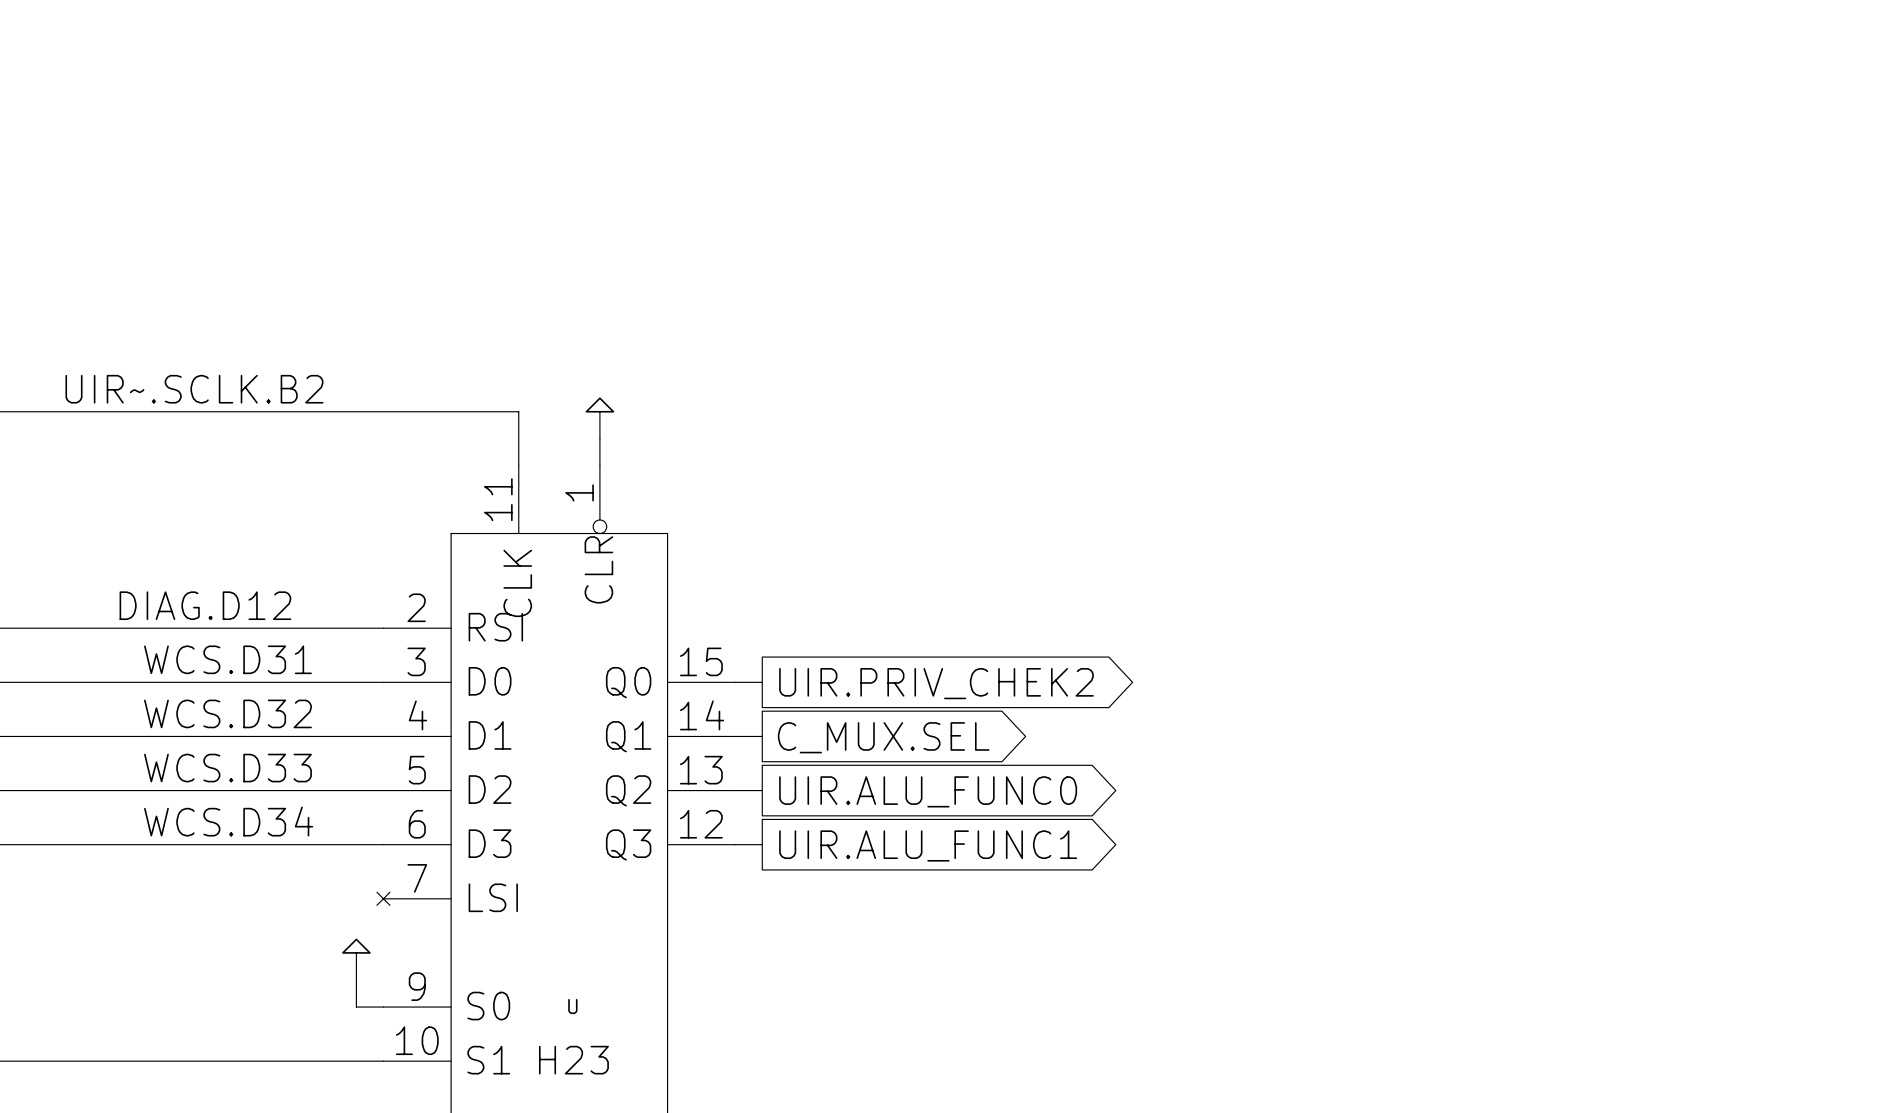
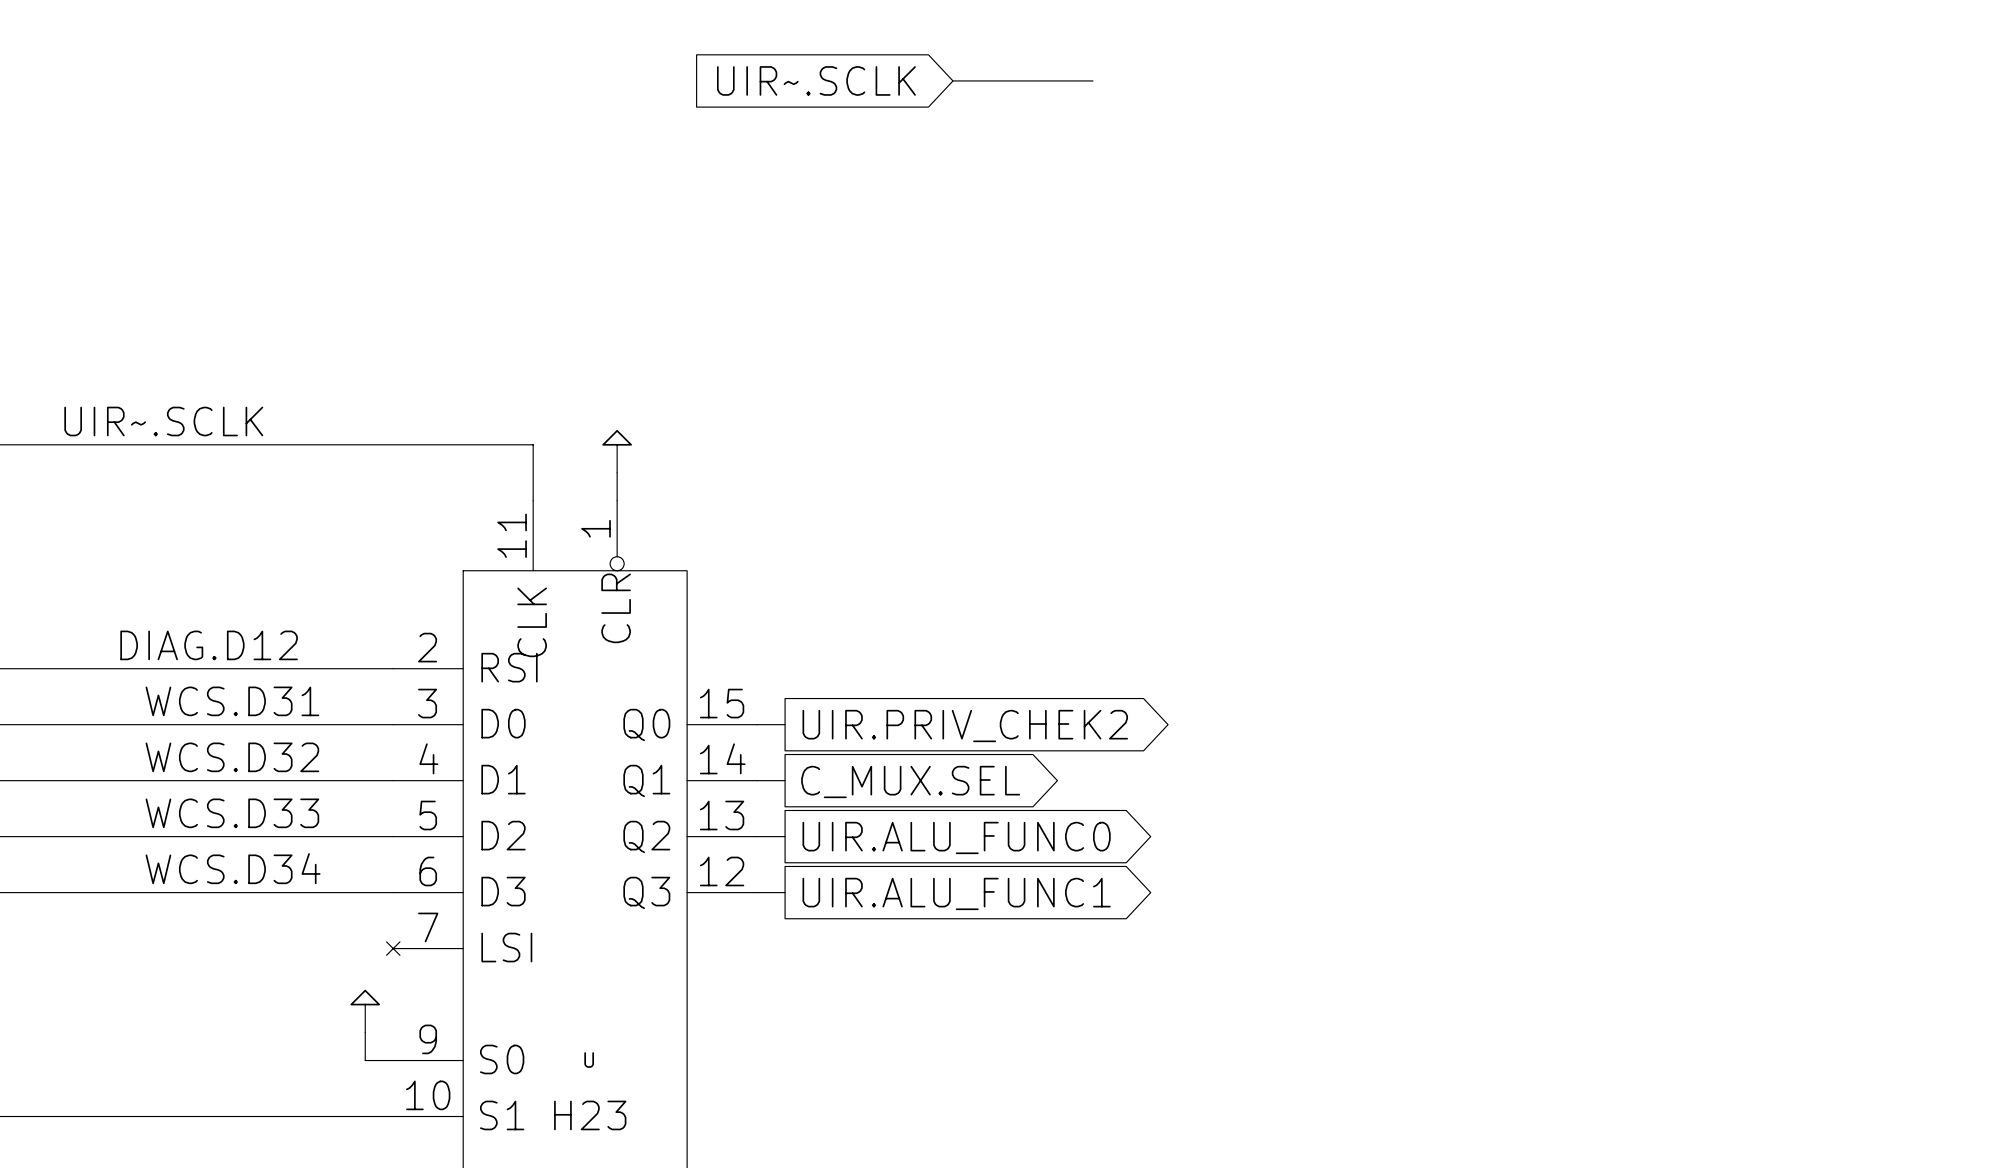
global label: none -> UIR~.SCLK (816, 80)
wire: none -> (952, 80) (1092, 80)
label: UIR~.SCLK.B2 (194, 389) -> UIR~.SCLK (163, 421)

